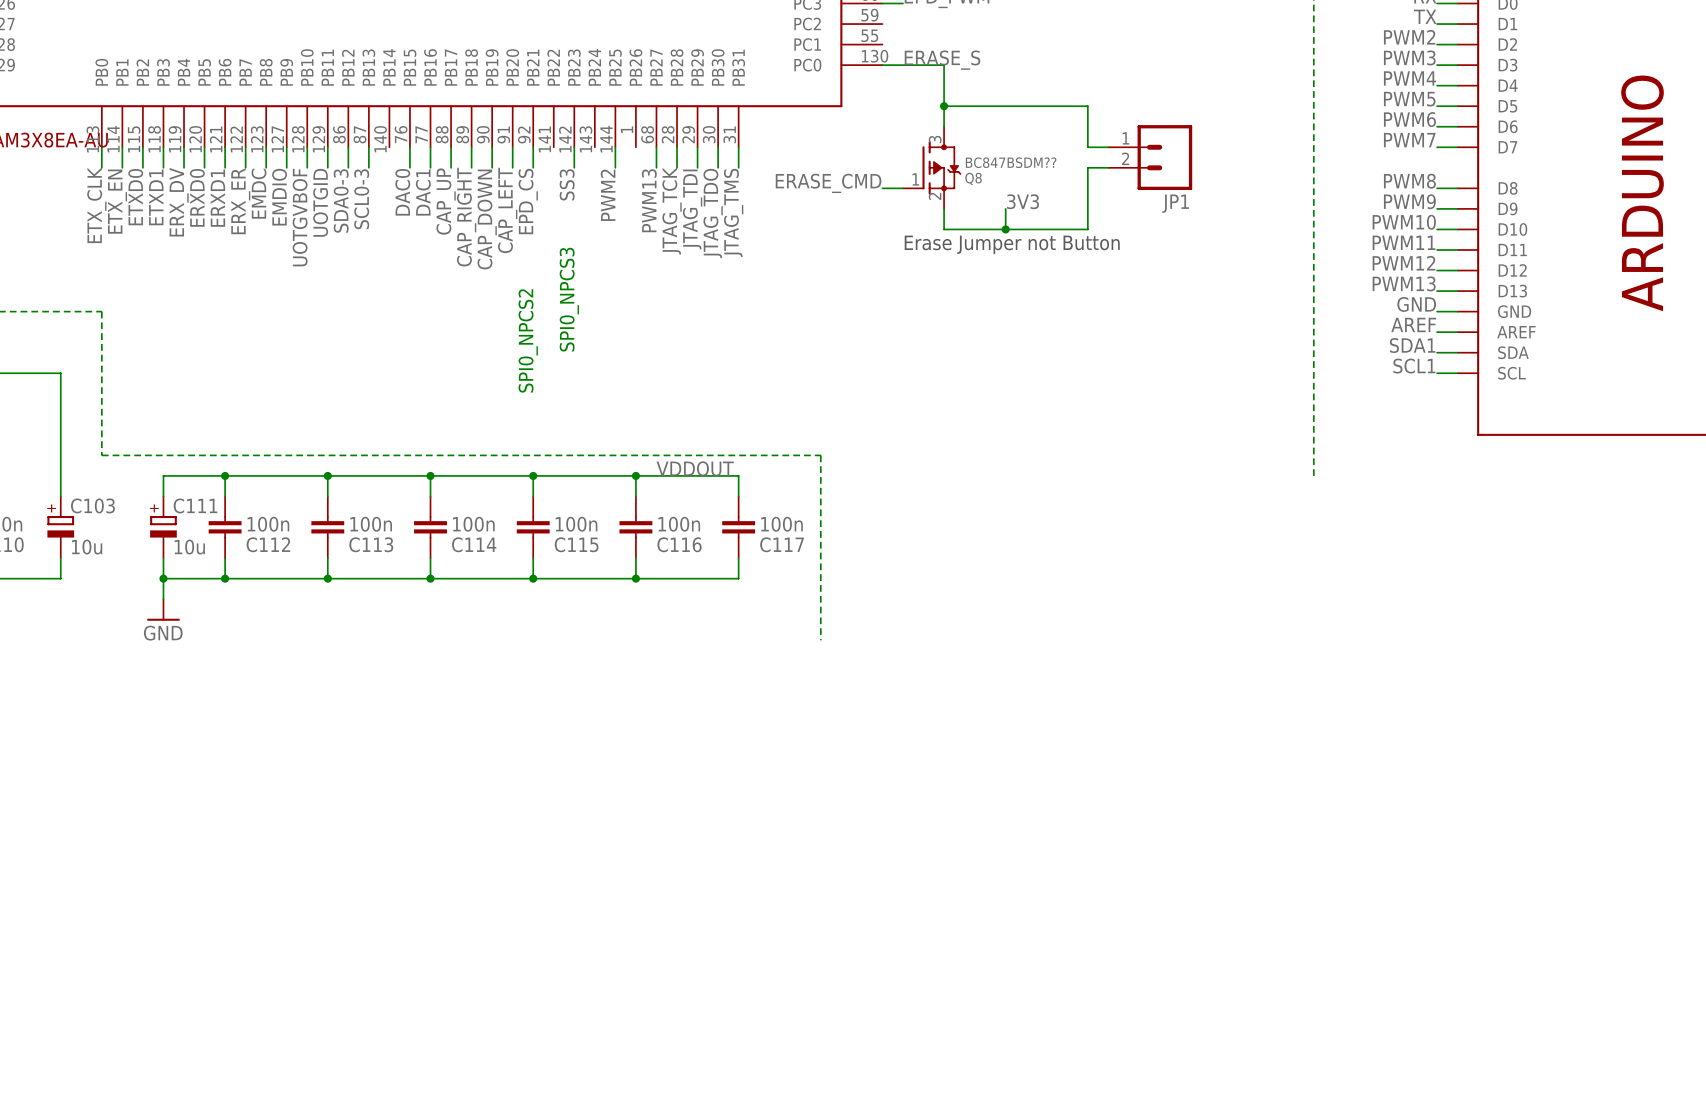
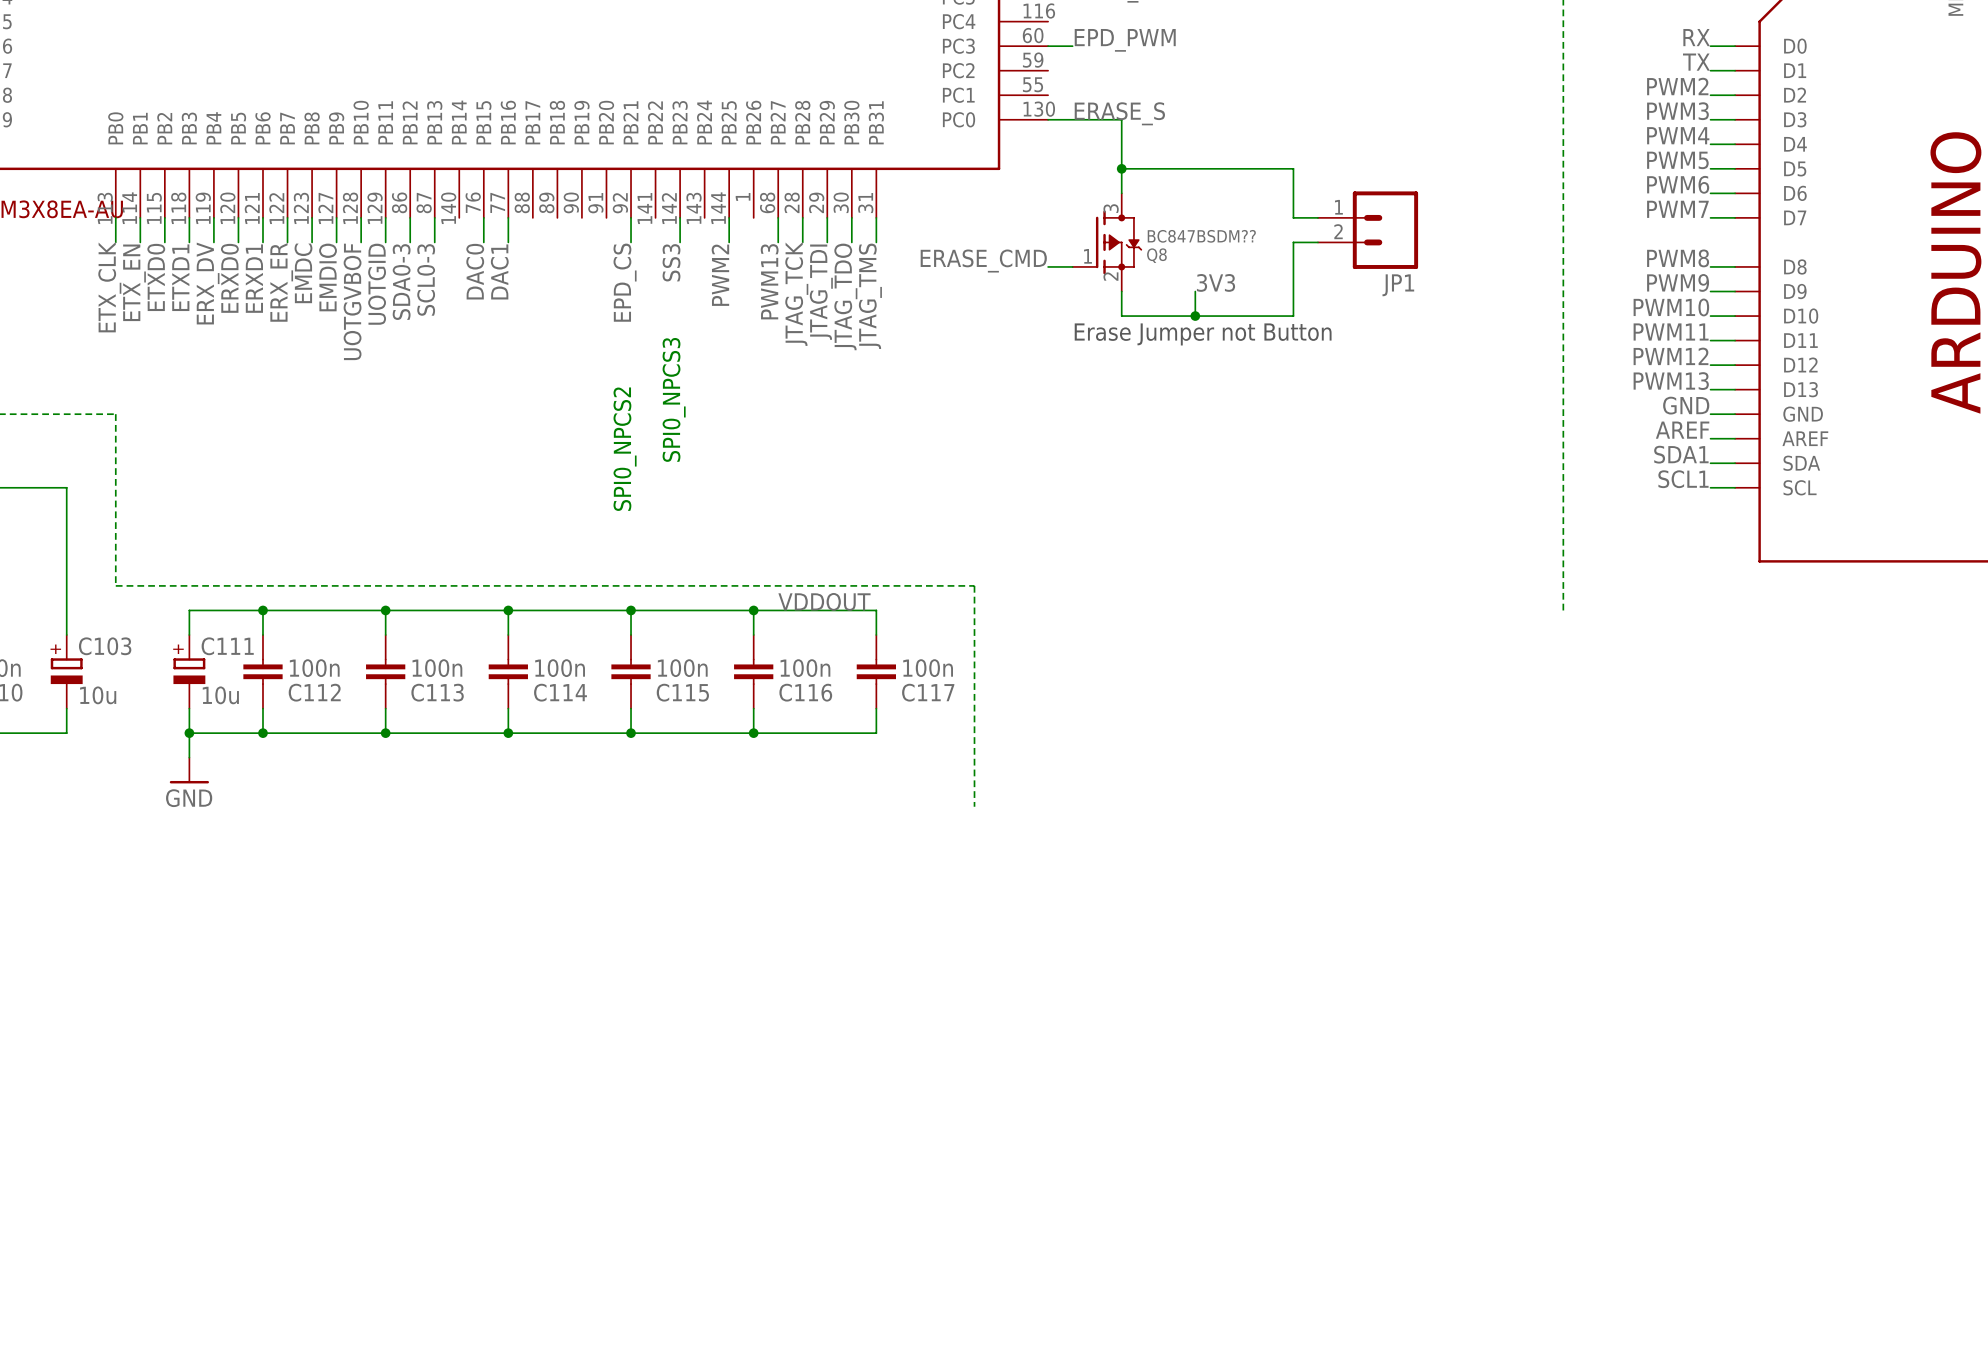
wire: (451, 147) (451, 167) -> none
wire: (471, 147) (471, 167) -> none
wire: (492, 147) (492, 167) -> none
wire: (512, 147) (512, 167) -> none
label: CAP_UP (446, 201) -> none
label: CAP_LEFT (507, 210) -> none
label: CAP_RIGHT (466, 217) -> none
label: CAP_DOWN (487, 219) -> none

